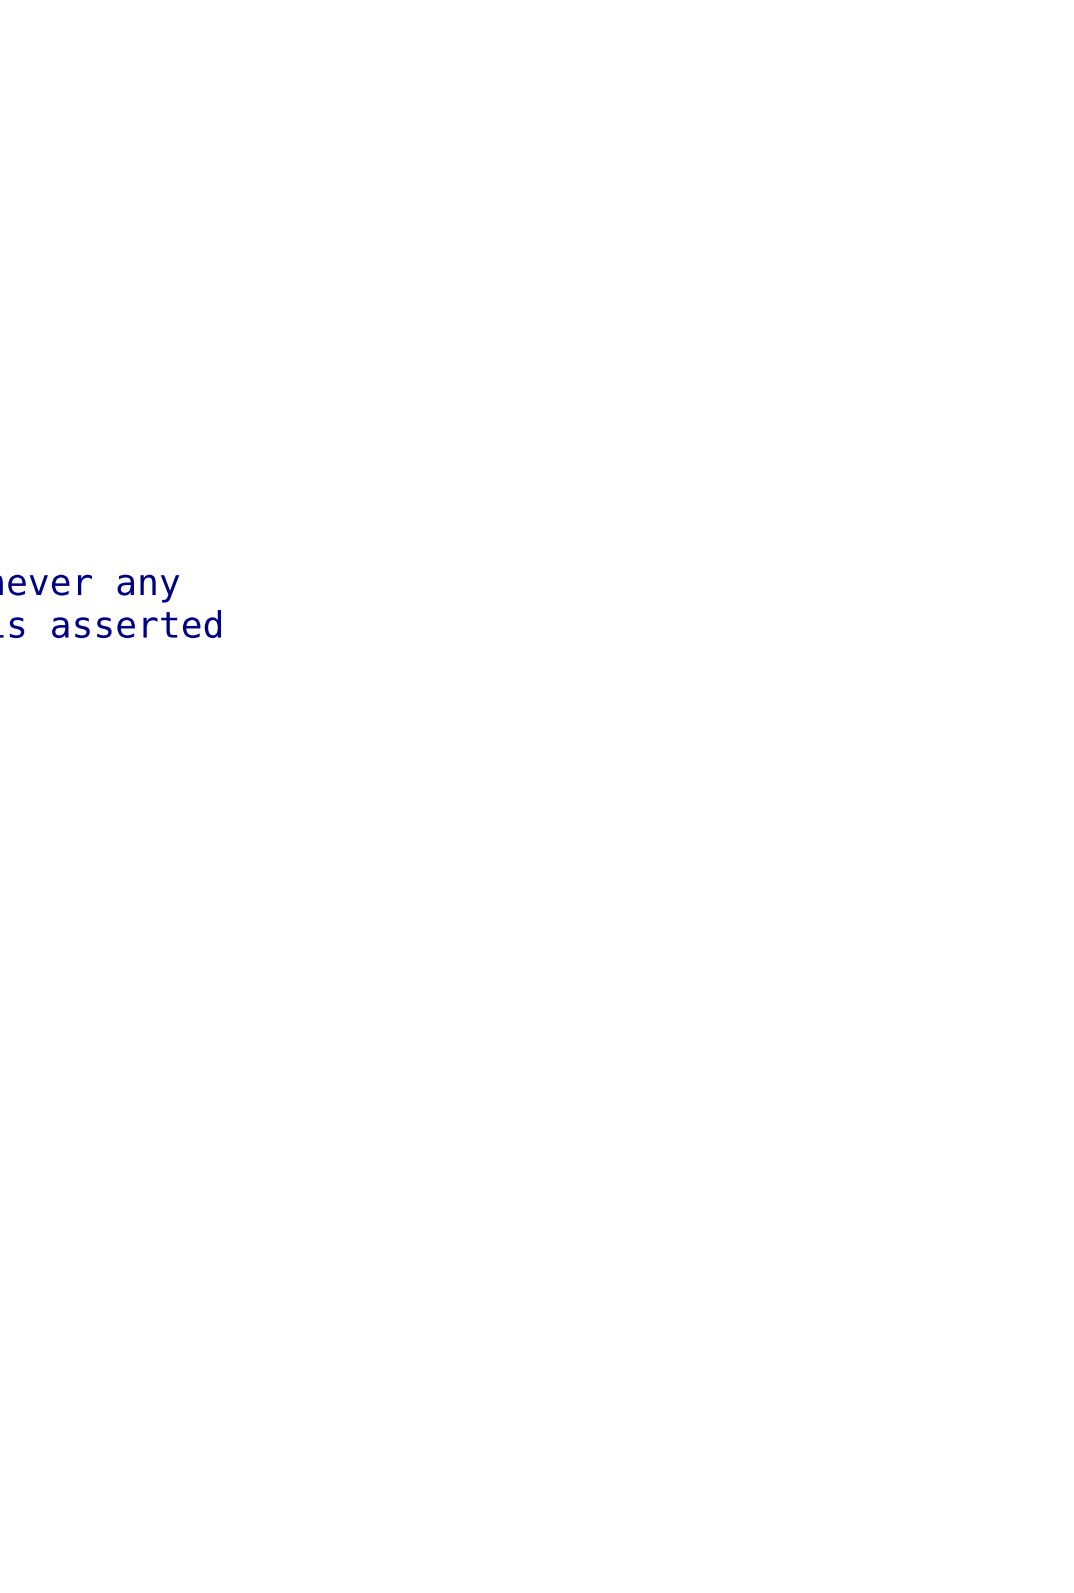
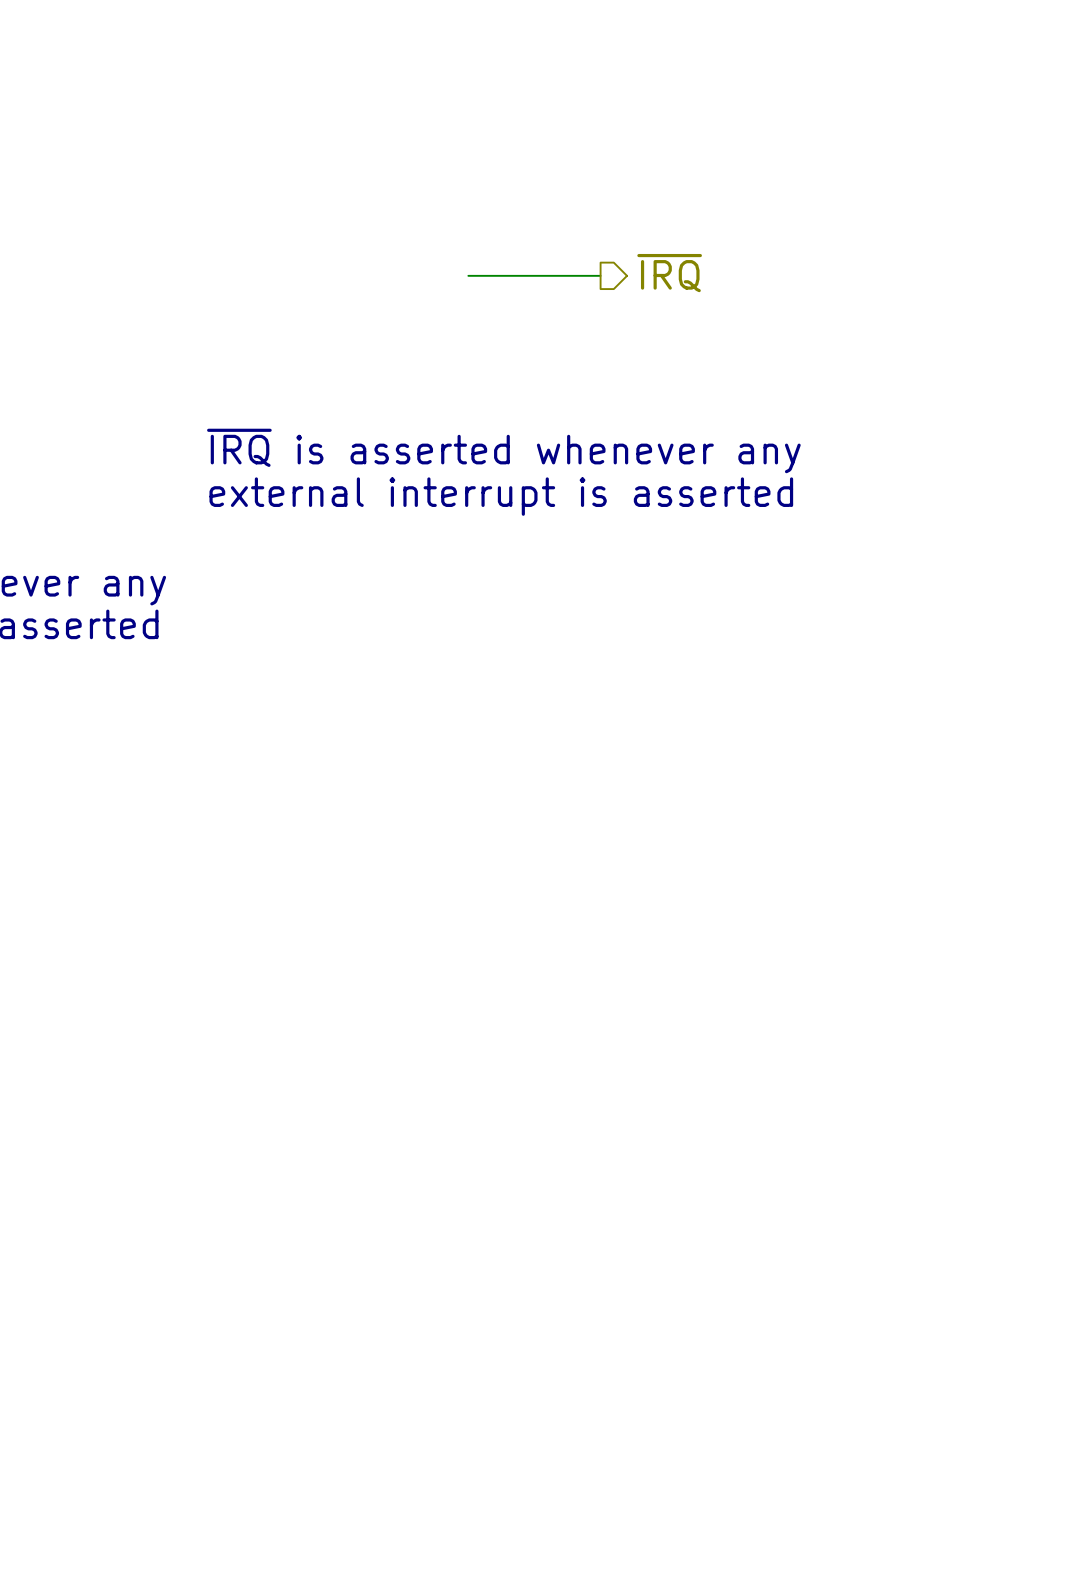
hierarchical label: none -> ~{IRQ} (669, 273)
wire: none -> (468, 275) (600, 275)
text: none -> ~{IRQ} is asserted whenever any (503, 450)
text: none -> external interrupt is asserted (501, 496)

